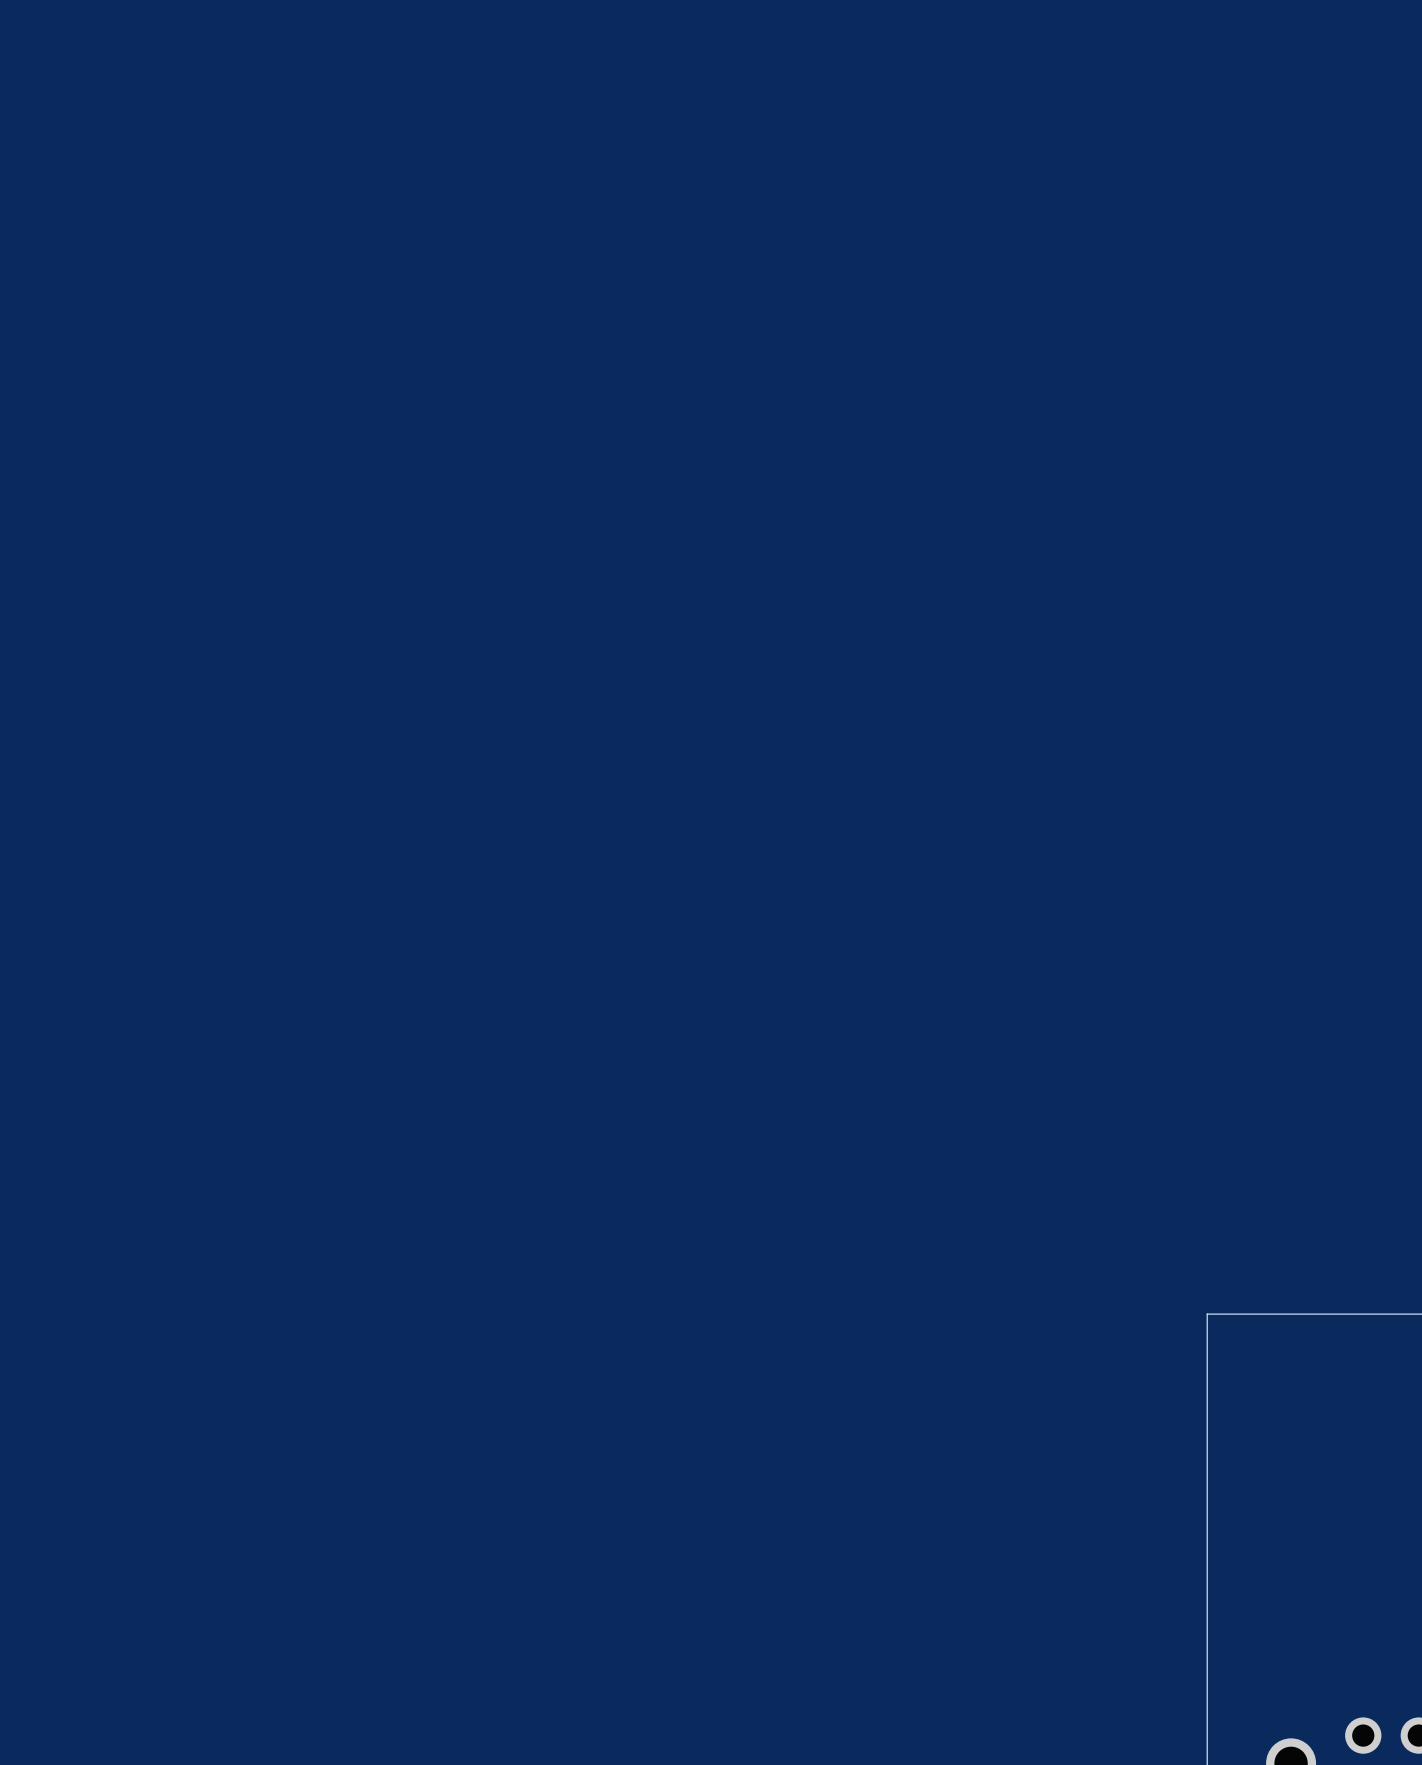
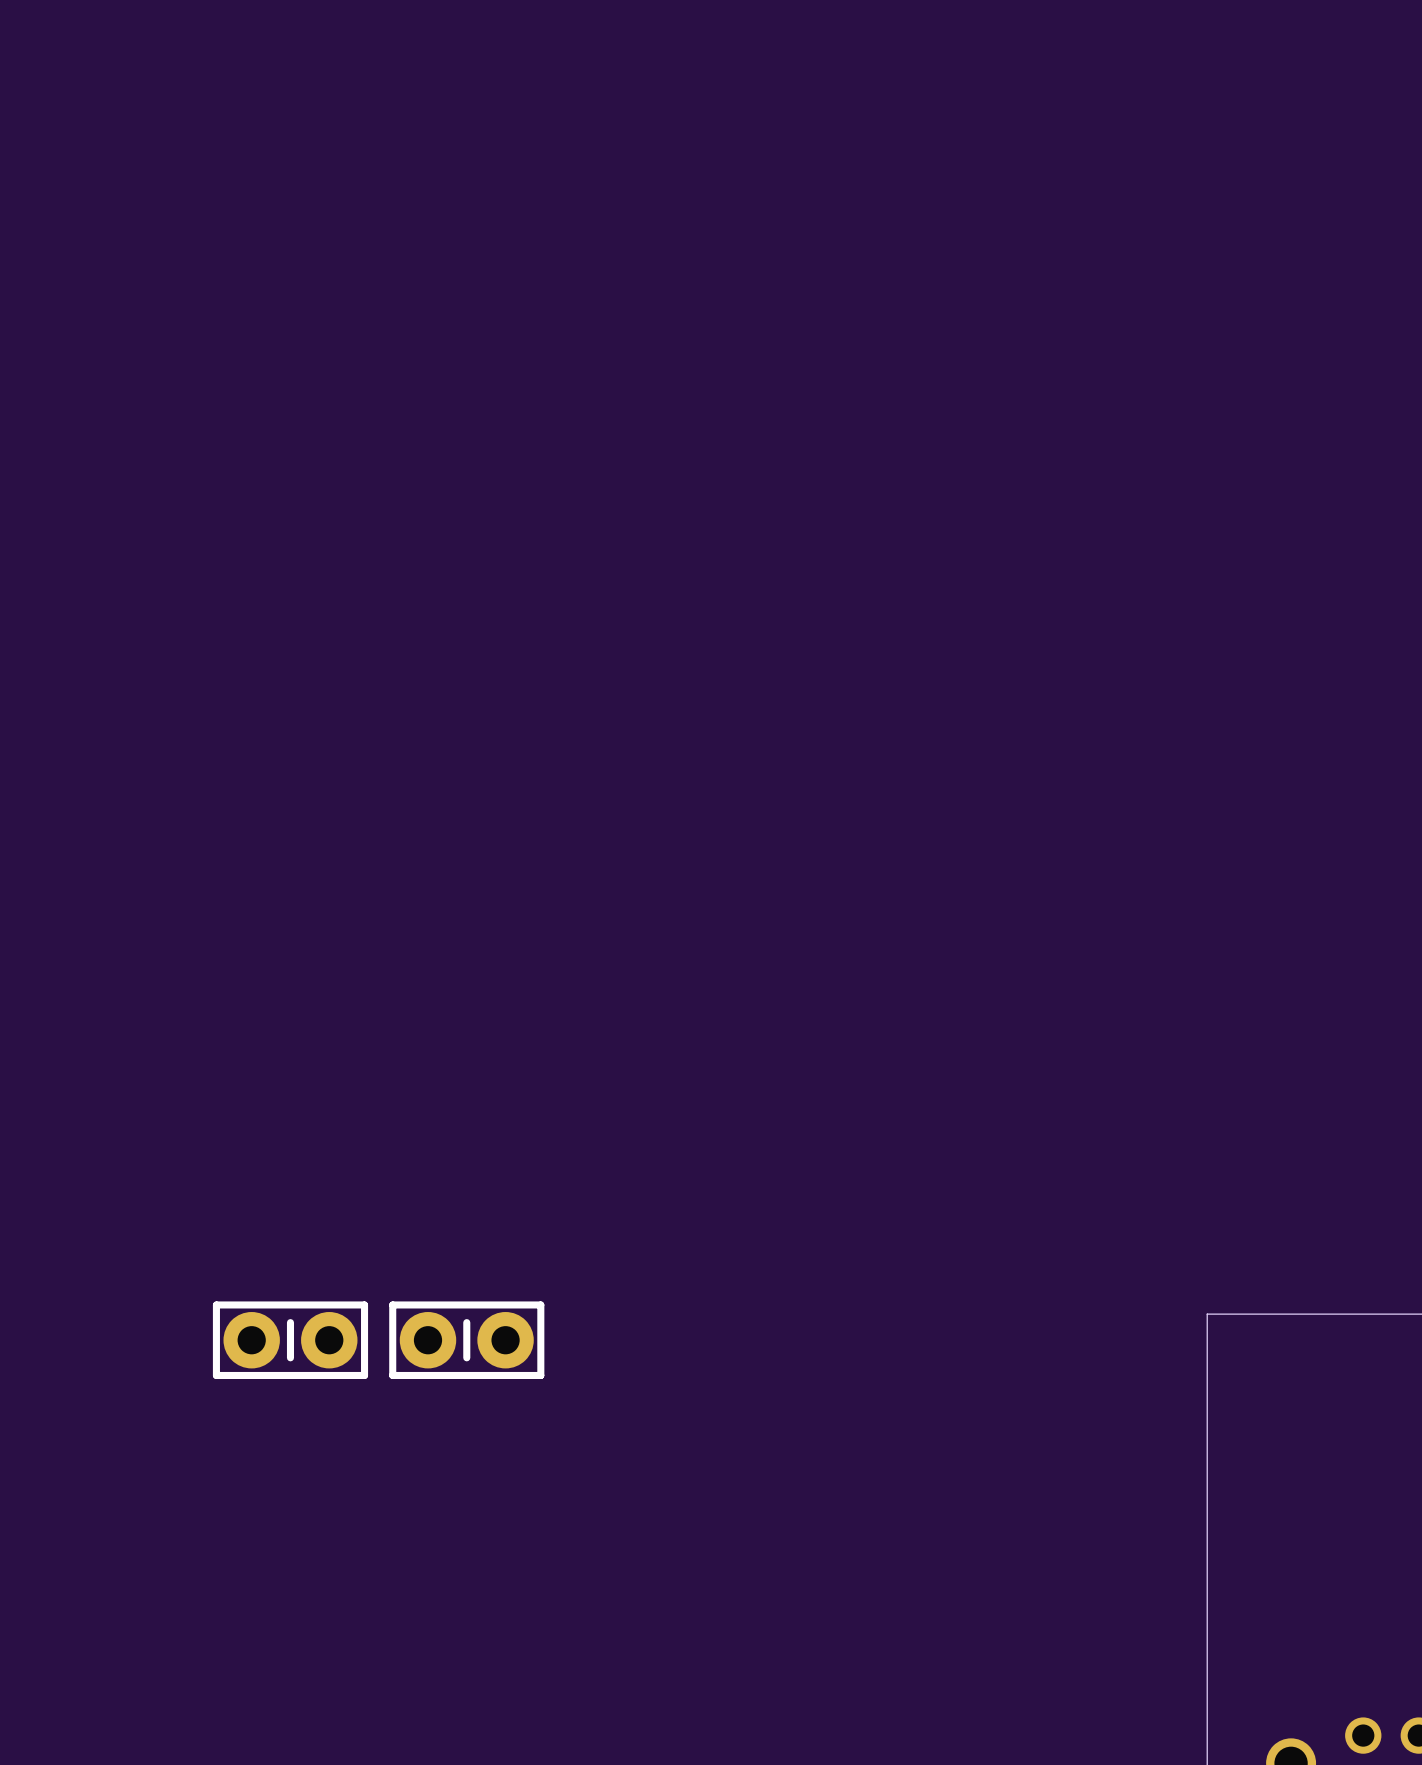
part: none -> (290, 1340)
part: none -> (466, 1340)

